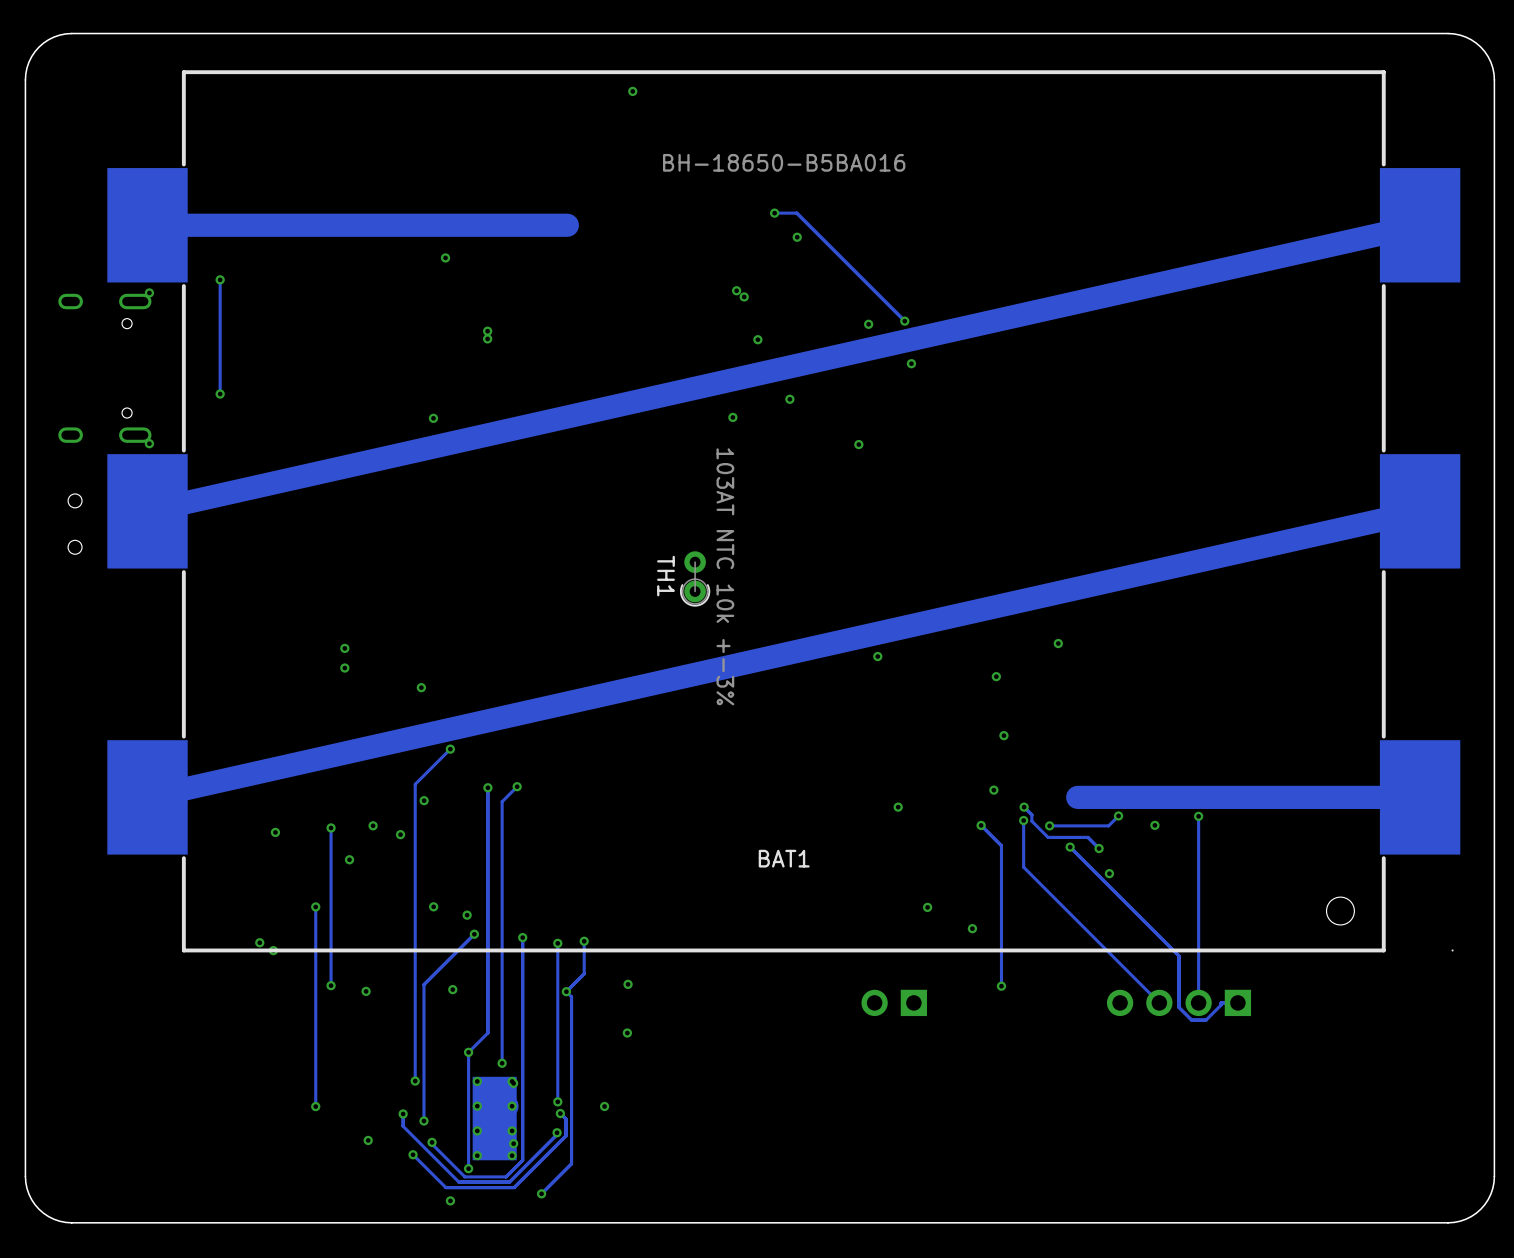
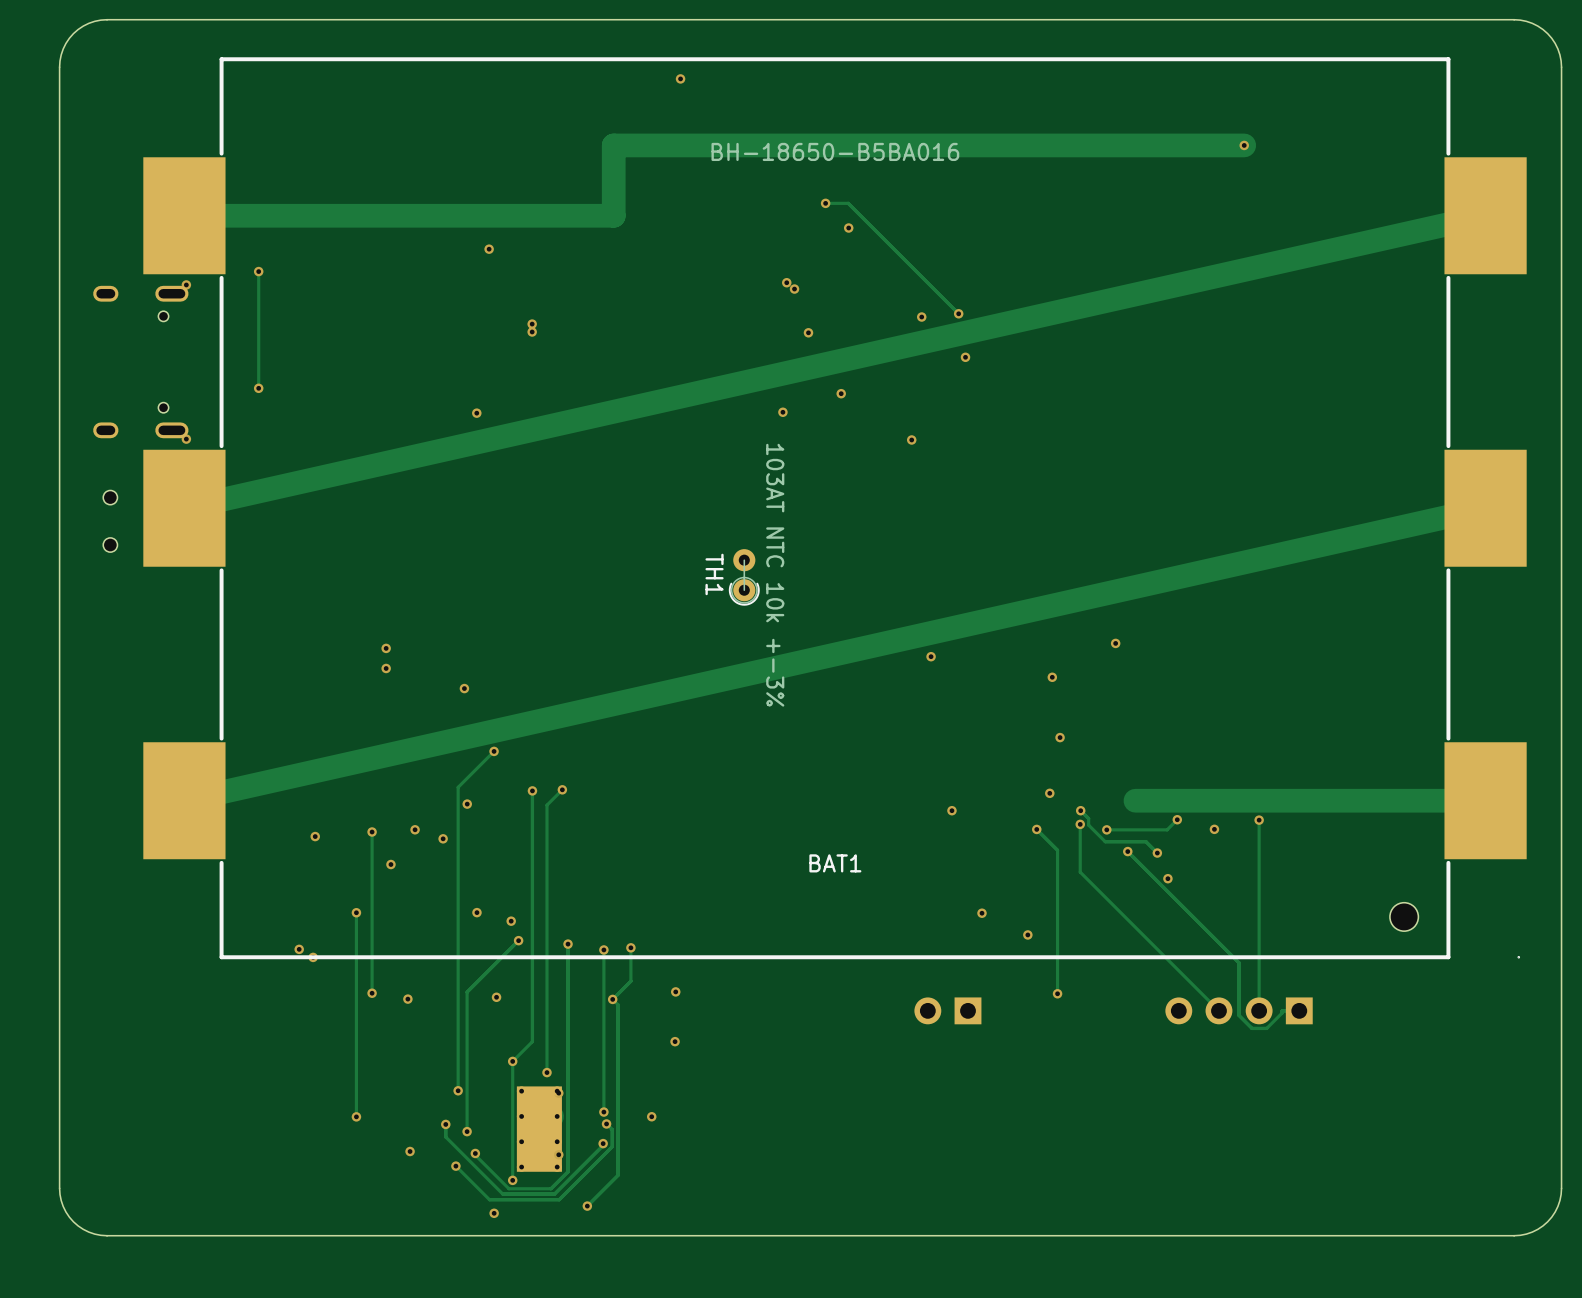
track: none -> (1244, 145) (613, 145) (613, 215)
via: none -> (1244, 145)

